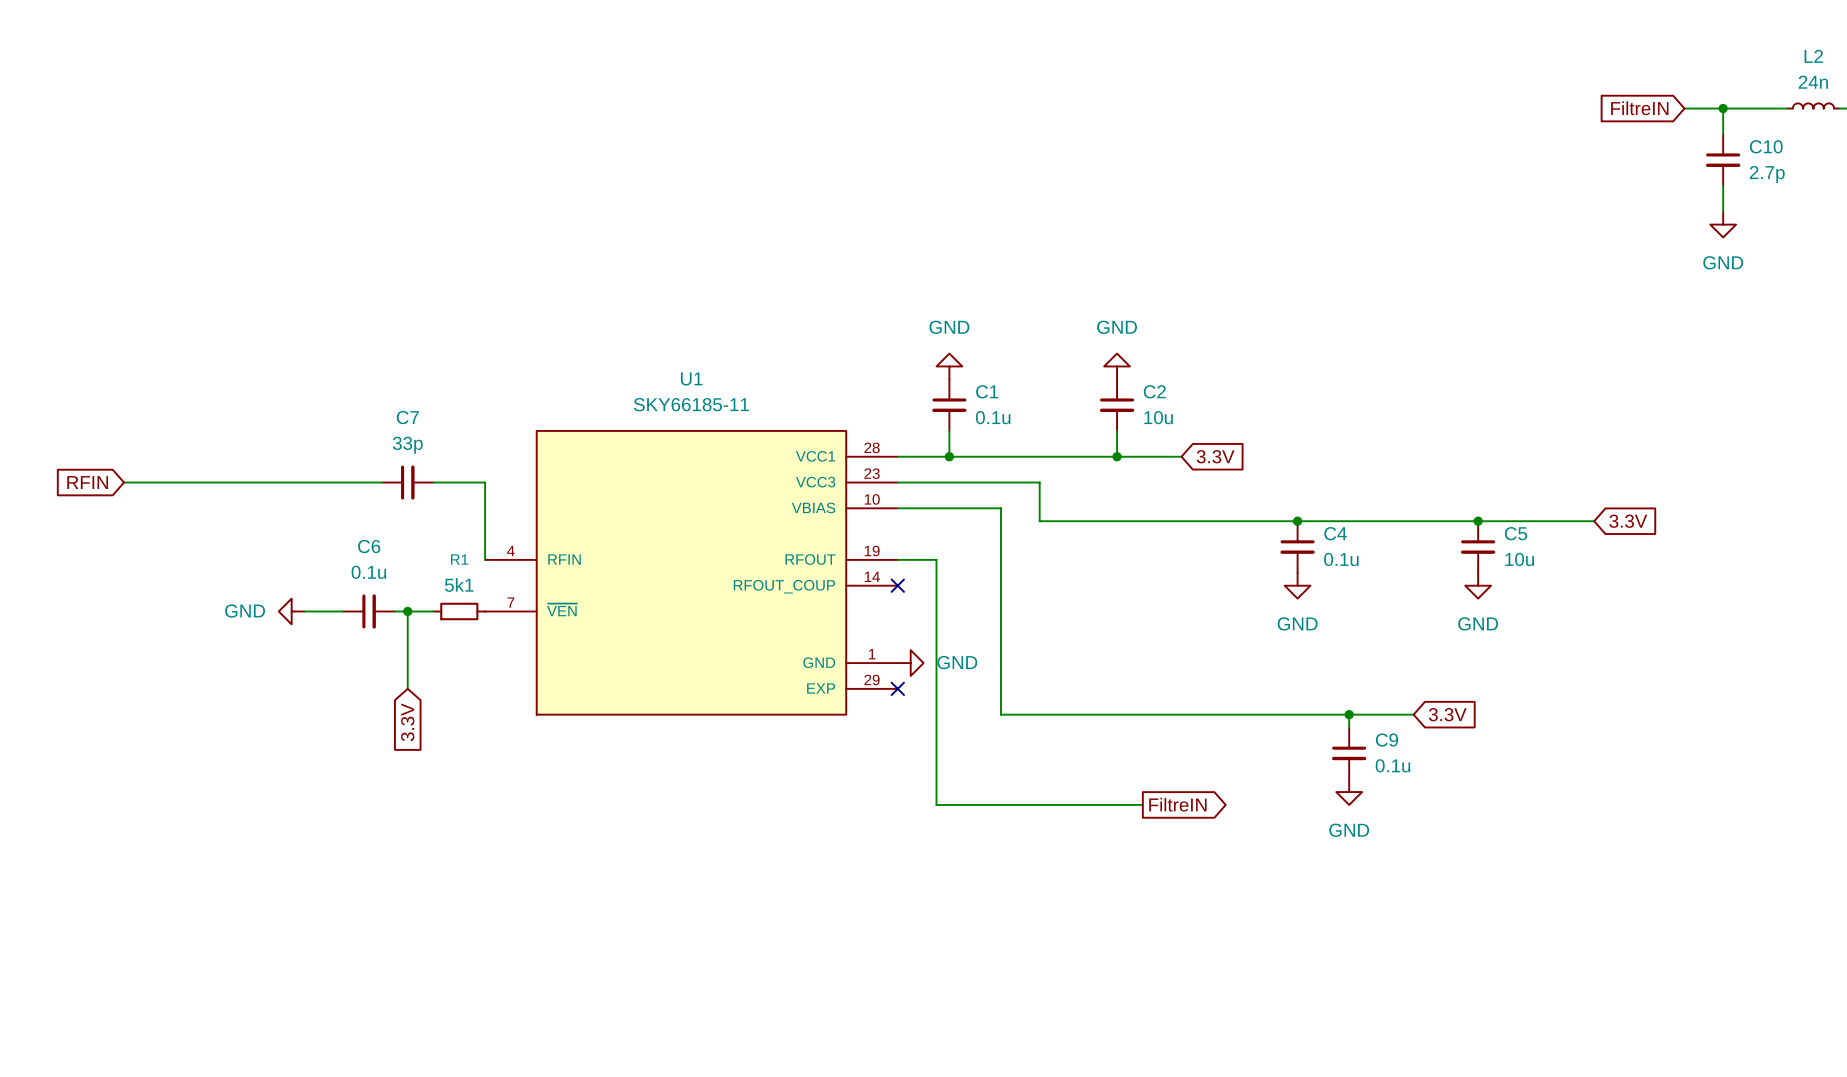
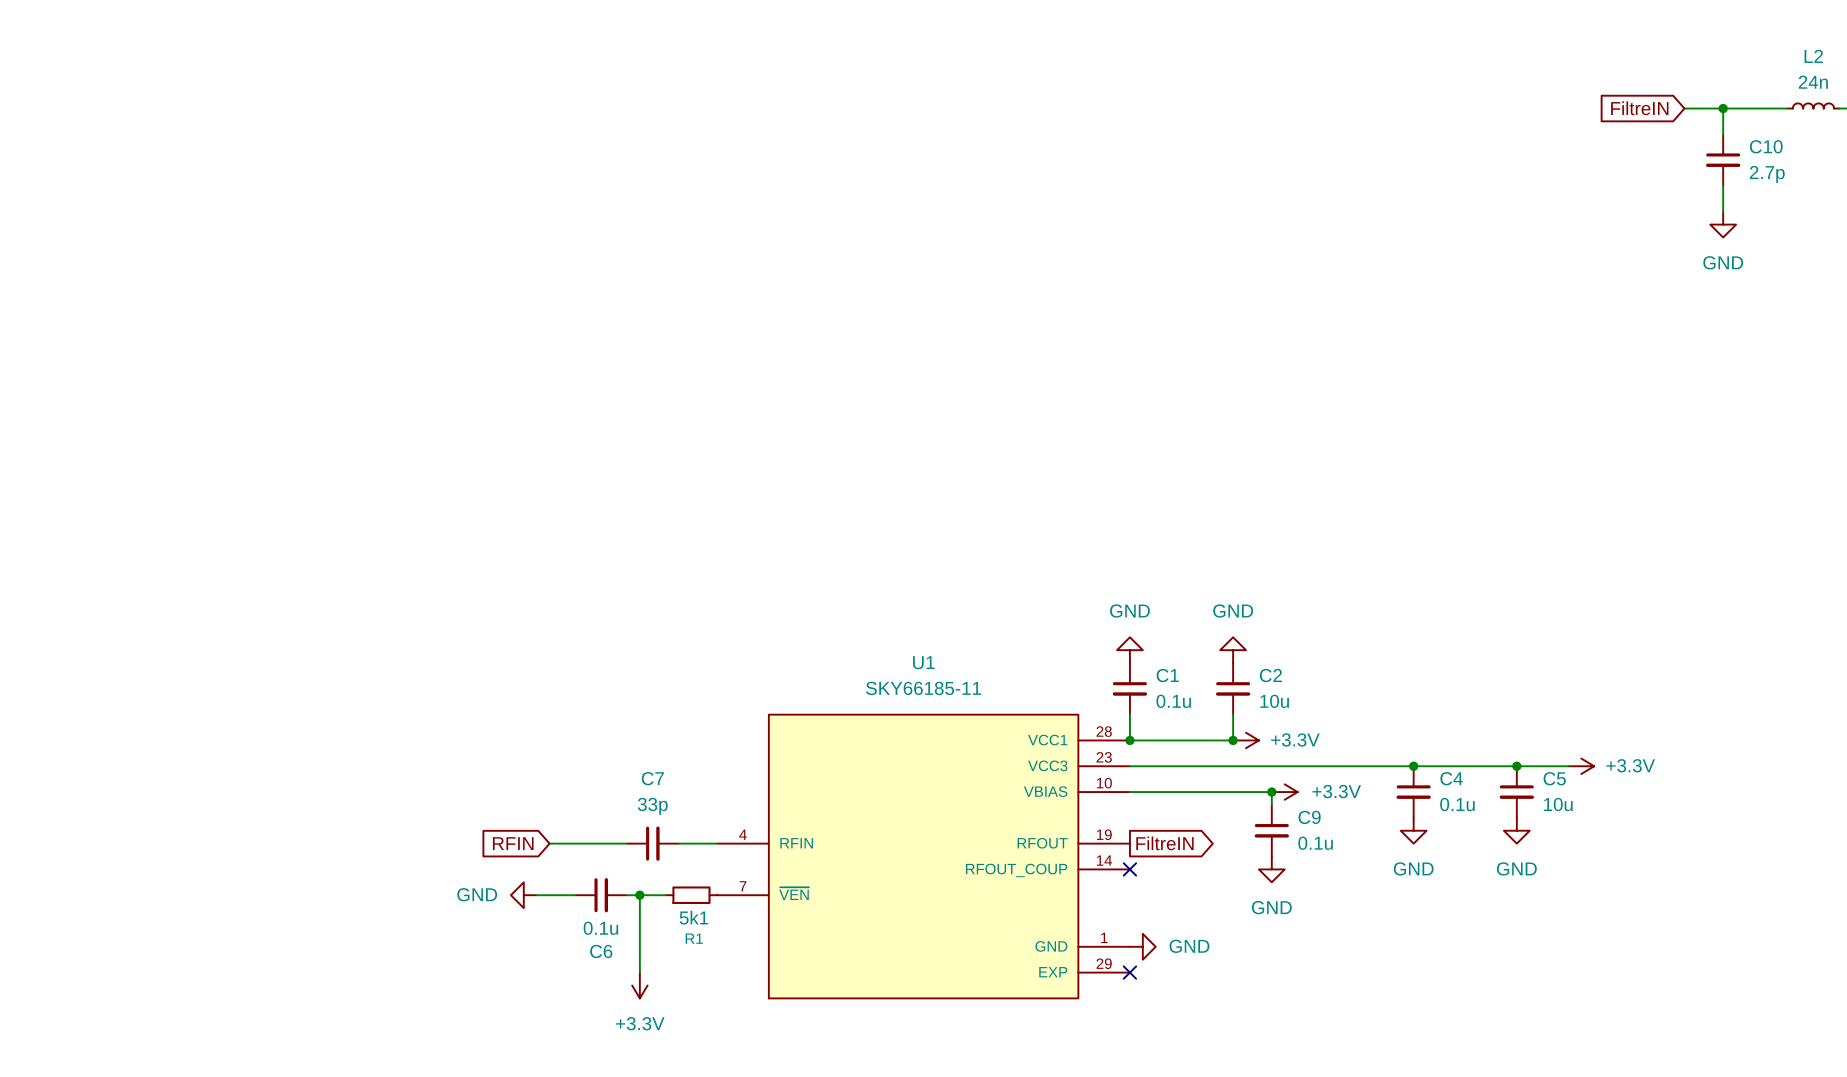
power symbol: GND (949, 366) -> none
power symbol: GND (1117, 366) -> none
C1 position: (949, 405) -> (1129, 688)
C2 position: (1117, 405) -> (1233, 688)
wire: (949, 430) (949, 456) -> none
wire: (1117, 430) (1117, 456) -> none
wire: (897, 456) (1181, 456) -> none
junction: (949, 456) -> none
junction: (1117, 456) -> none
global label: 3.3V (1215, 456) -> none
global label: RFIN (87, 482) -> none
wire: (124, 482) (381, 482) -> none
C7 position: (407, 482) -> (652, 843)
wire: (433, 482) (485, 482) (485, 559) -> none
wire: (897, 482) (1039, 482) (1039, 521) (1594, 521) -> none
wire: (897, 508) (1000, 508) (1000, 714) (1413, 714) -> none
junction: (1297, 521) -> none
junction: (1478, 521) -> none
global label: 3.3V (1628, 521) -> none
C6 name position: C6 (369, 546) -> C6 (601, 951)
C4 position: (1297, 547) -> (1413, 792)
C5 position: (1478, 547) -> (1516, 792)
R1 name position: R1 (459, 559) -> R1 (694, 938)
wire: (897, 559) (936, 559) (936, 804) (1142, 804) -> none
C6 value position: 0.1u (368, 572) -> 0.1u (600, 928)
U1 position: (691, 572) -> (923, 856)
R1 value position: 5k1 (459, 584) -> 5k1 (693, 917)
no-connect mark: (897, 585) -> none
power symbol: GND (1297, 585) -> none
power symbol: GND (1478, 585) -> none
power symbol: GND (291, 611) -> none
wire: (304, 611) (343, 611) -> none
C6 position: (369, 611) -> (601, 895)
wire: (394, 611) (433, 611) -> none
wire: (407, 611) (407, 688) -> none
junction: (407, 611) -> none
R1 position: (459, 611) -> (691, 895)
power symbol: none -> GND (1129, 650)
power symbol: none -> GND (1233, 650)
power symbol: GND (910, 663) -> none
no-connect mark: (897, 688) -> none
wire: none -> (1129, 714) (1129, 740) (1233, 740) (1233, 714)
wire: (1349, 714) (1349, 727) -> none
junction: (1349, 714) -> none
global label: 3.3V (1447, 714) -> none
global label: 3.3V (407, 722) -> none
junction: none -> (1129, 740)
junction: none -> (1233, 740)
power symbol: none -> +3.3V (1246, 740)
C9 position: (1349, 753) -> (1271, 830)
wire: none -> (1129, 766) (1568, 766)
junction: none -> (1413, 766)
junction: none -> (1516, 766)
power symbol: none -> +3.3V (1581, 766)
wire: none -> (1129, 792) (1271, 792) (1271, 804)
junction: none -> (1271, 792)
power symbol: none -> +3.3V (1284, 792)
power symbol: GND (1349, 792) -> none
global label position: FiltreIN (1177, 804) -> FiltreIN (1164, 843)
power symbol: none -> GND (1413, 830)
power symbol: none -> GND (1516, 830)
global label: none -> RFIN (513, 843)
wire: none -> (549, 843) (626, 843)
wire: none -> (678, 843) (717, 843)
no-connect mark: none -> (1129, 869)
power symbol: none -> GND (1271, 869)
power symbol: none -> GND (523, 895)
wire: none -> (536, 895) (575, 895)
wire: none -> (626, 895) (665, 895)
wire: none -> (639, 895) (639, 972)
junction: none -> (639, 895)
power symbol: none -> GND (1142, 946)
no-connect mark: none -> (1129, 972)
power symbol: none -> +3.3V (639, 985)

